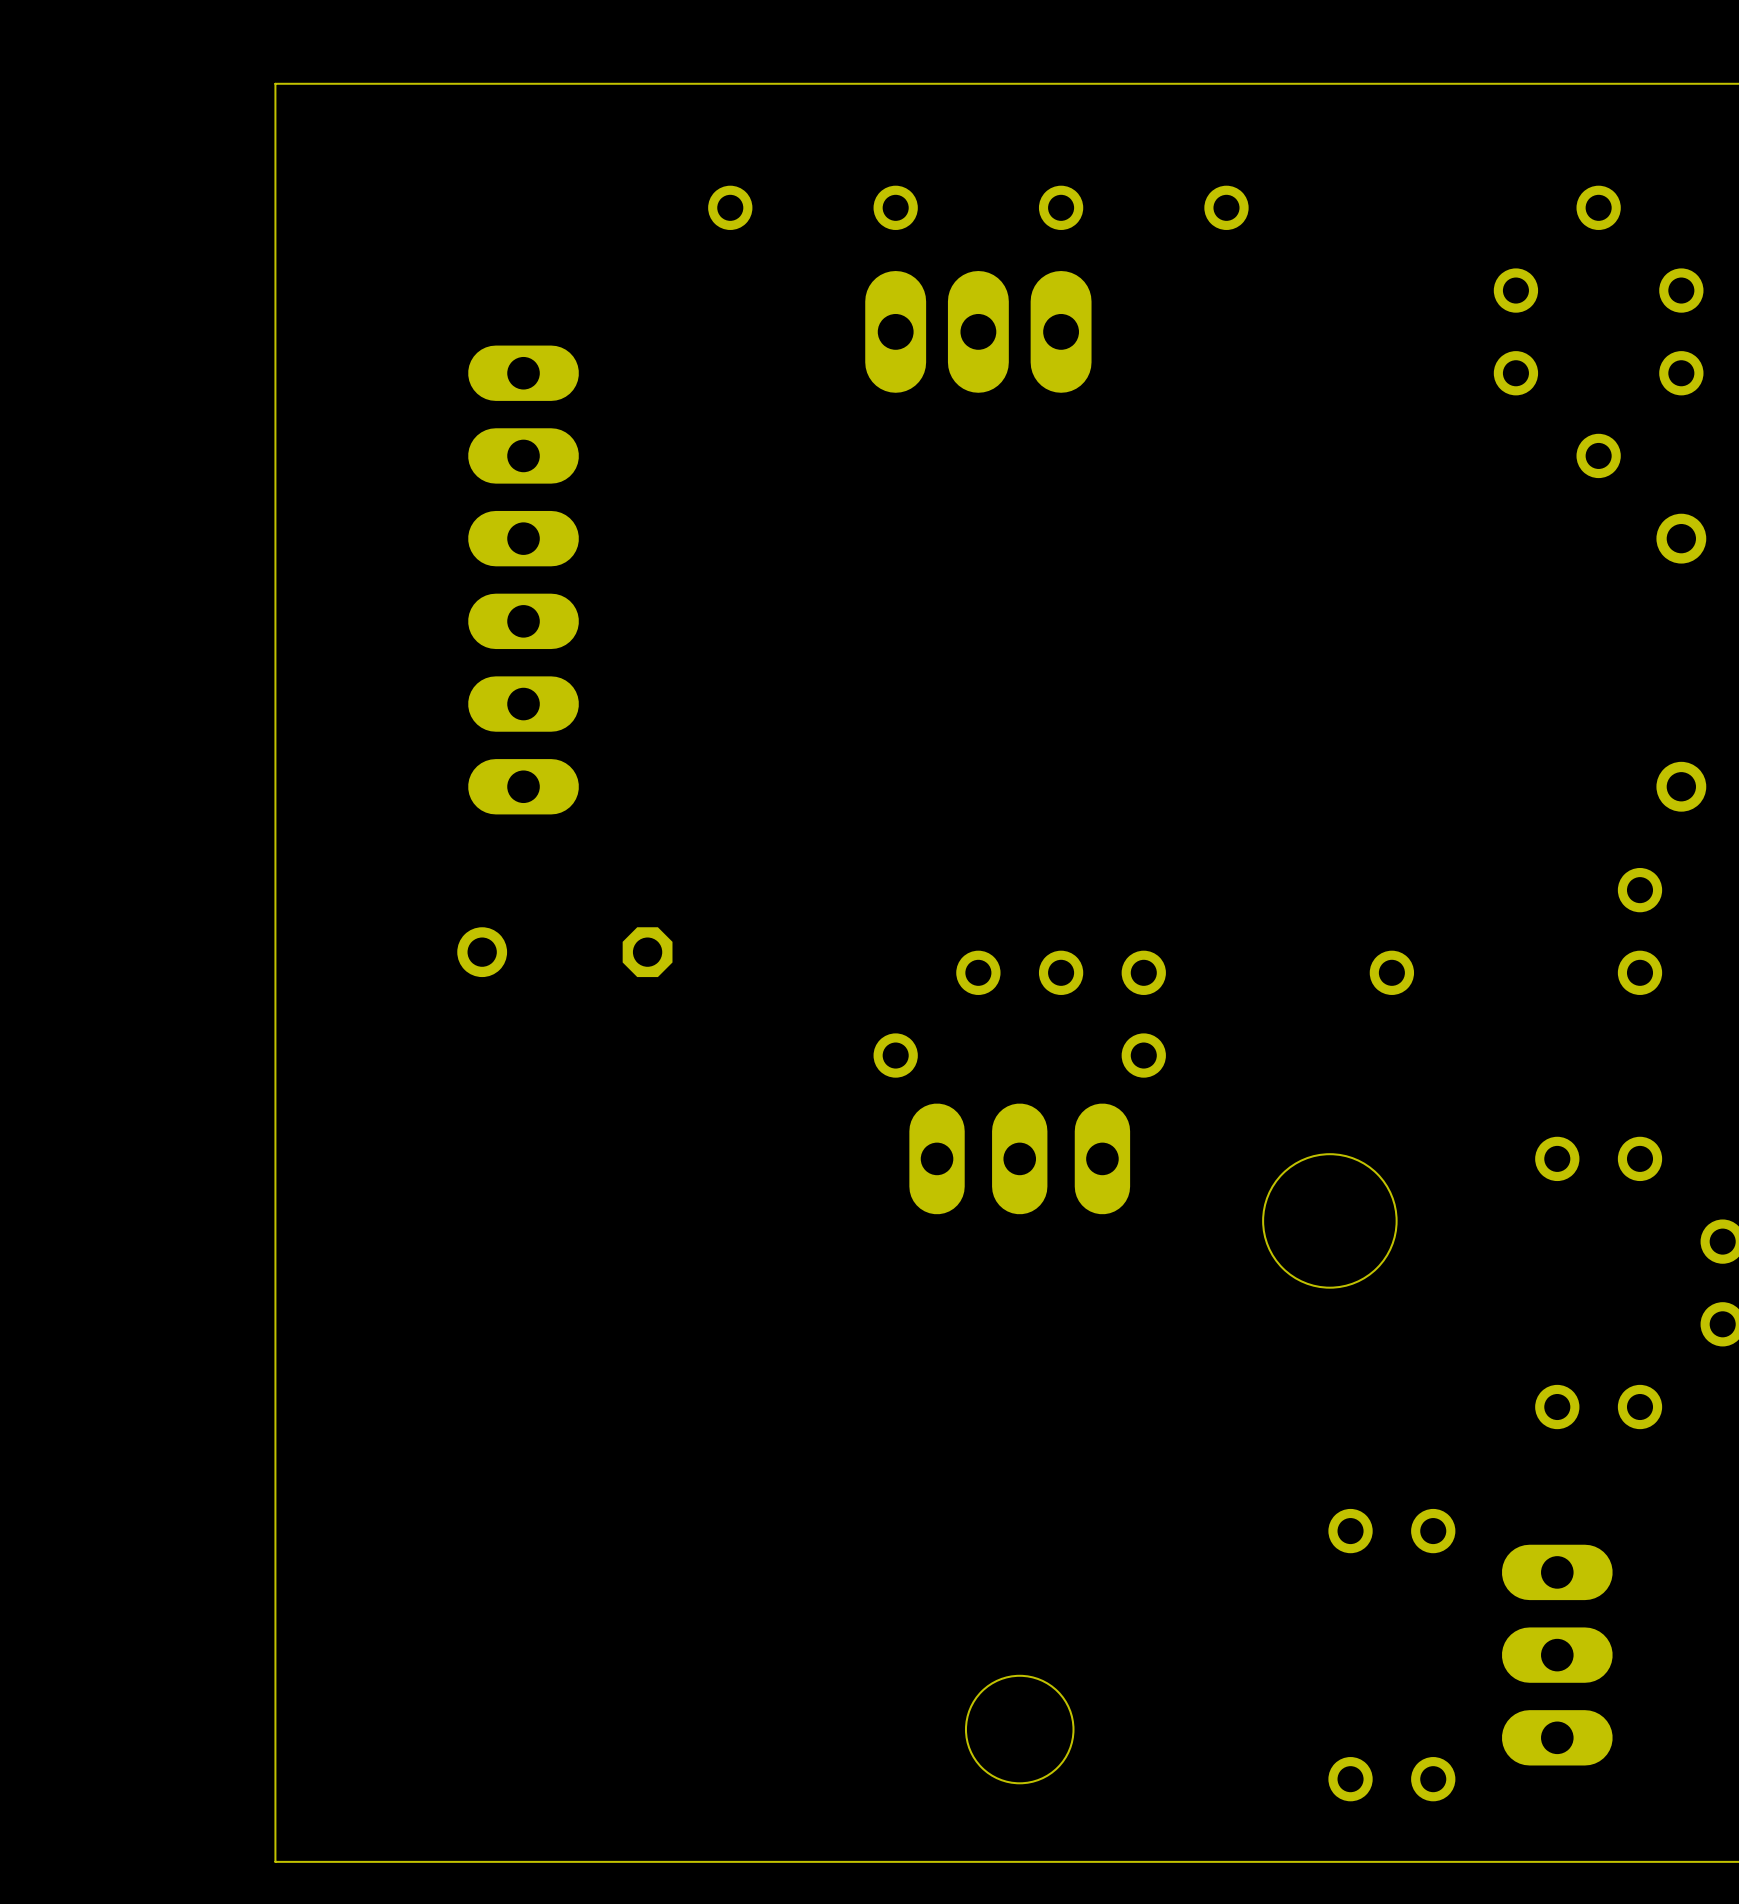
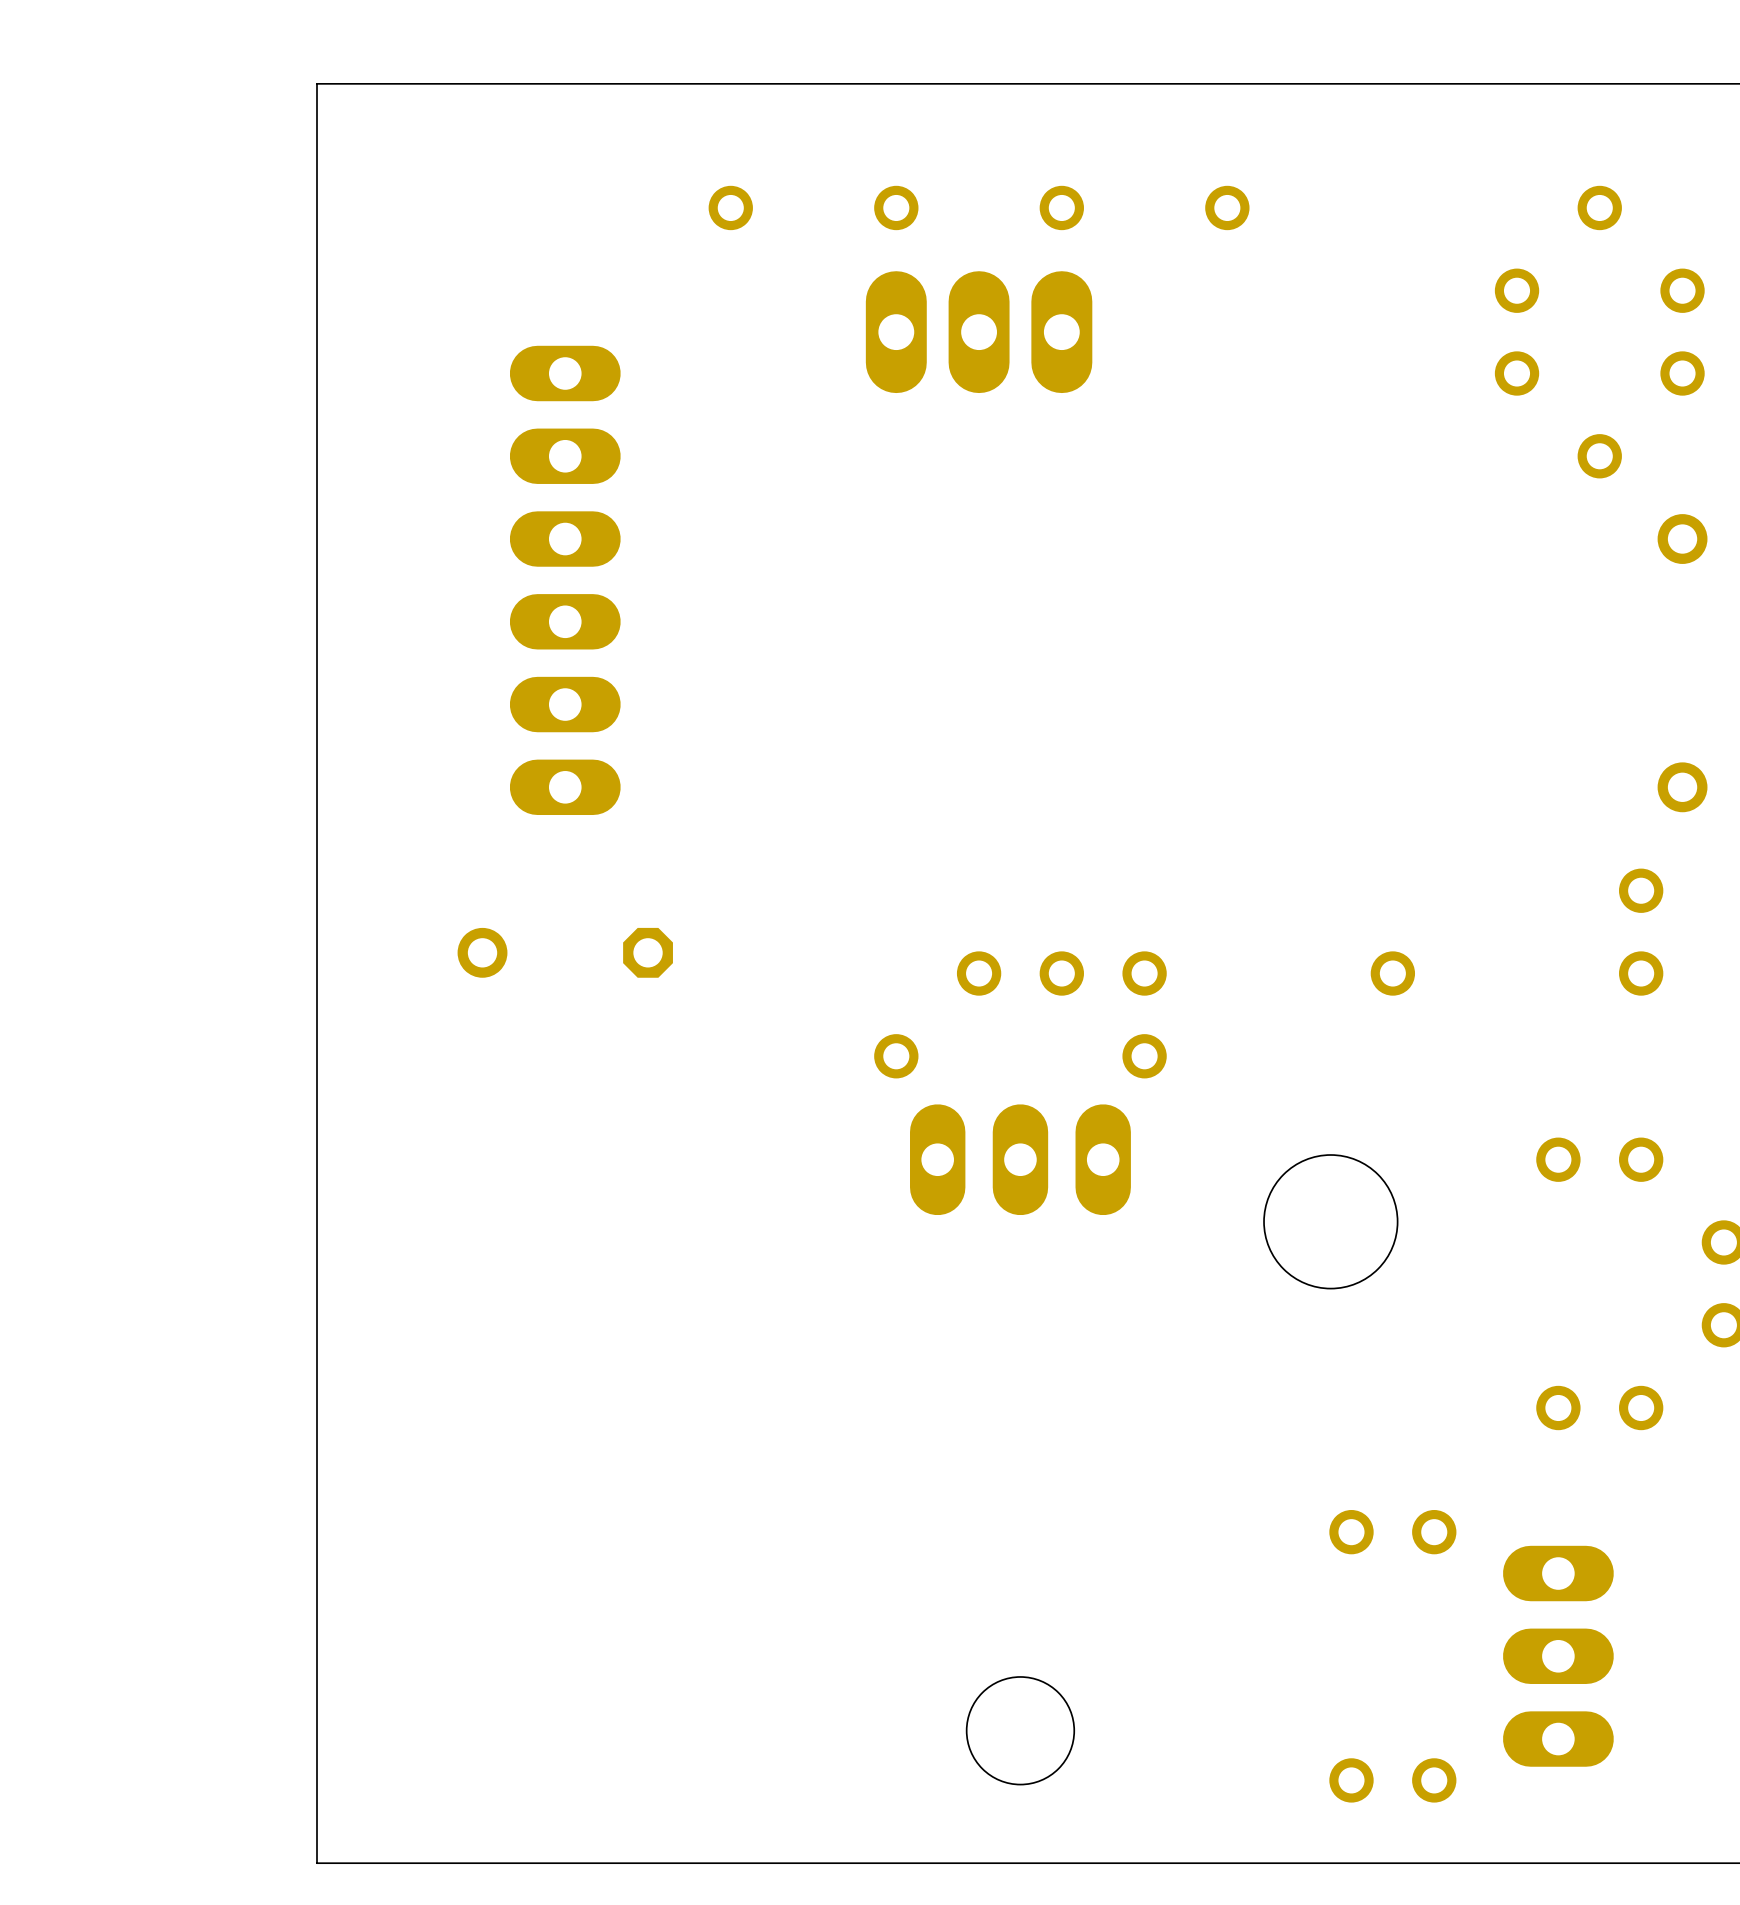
board edge: (316, 83) (275, 83) (275, 1861) (316, 1861) -> (317, 83) (317, 1863)
part position: (523, 497) -> (565, 497)
part position: (523, 745) -> (565, 745)

